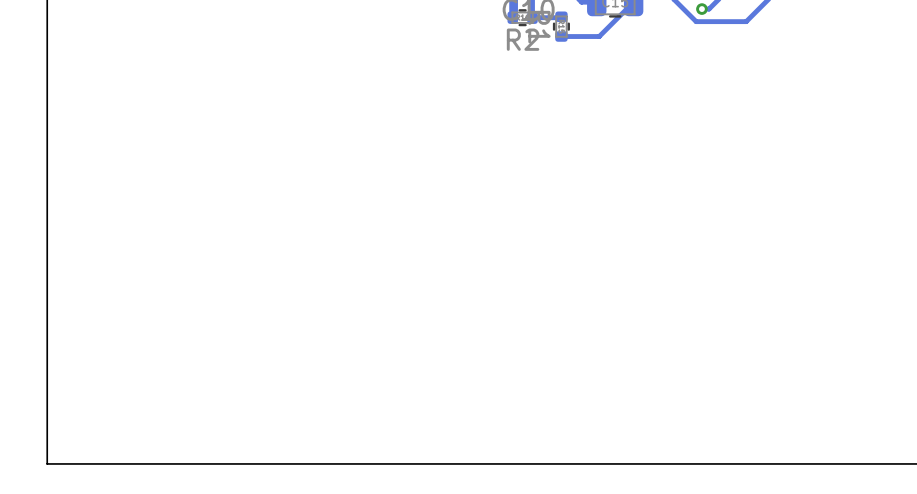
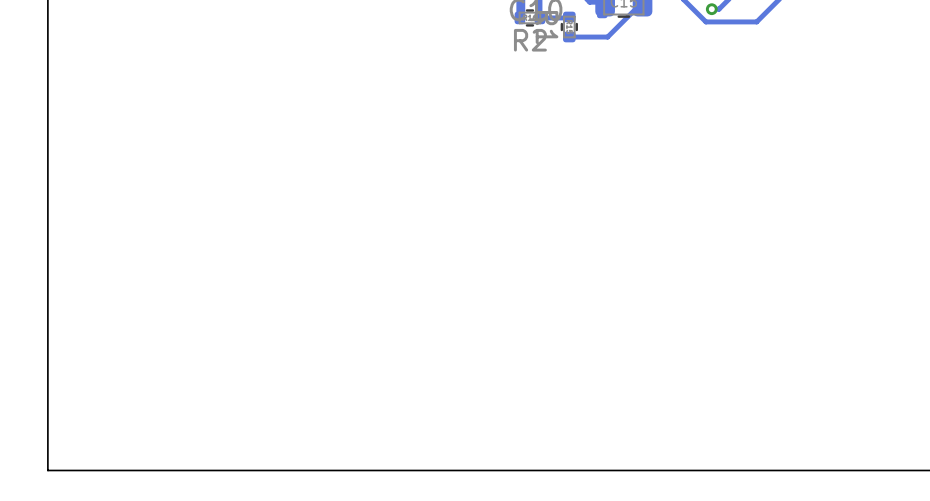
track: none -> (605, 15) (599, 15)

